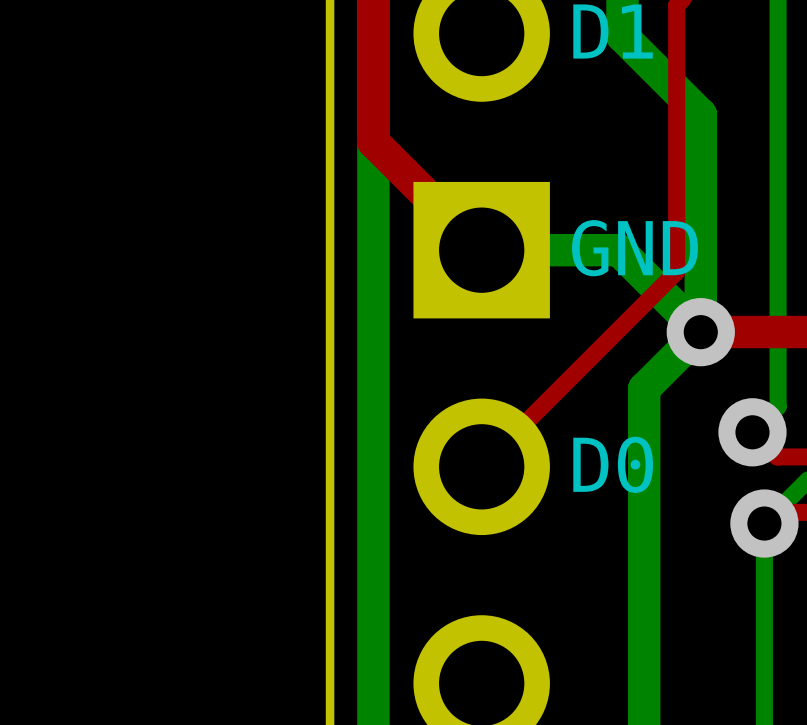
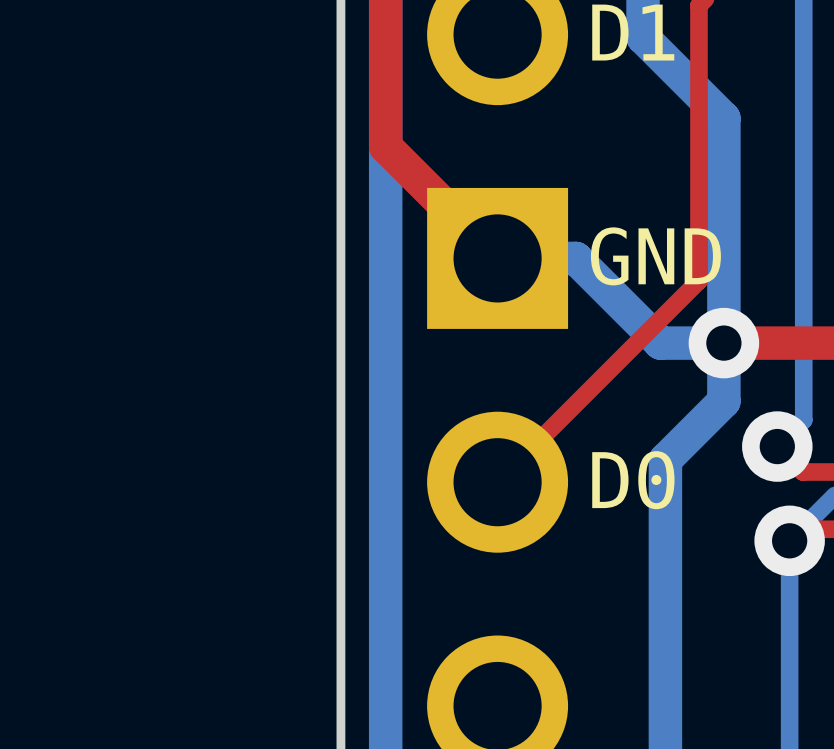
bottom track: (557, 250) (618, 250) (700, 332) (644, 388) (644, 445) -> (575, 258) (660, 343) (723, 343) (723, 401) (665, 459)

